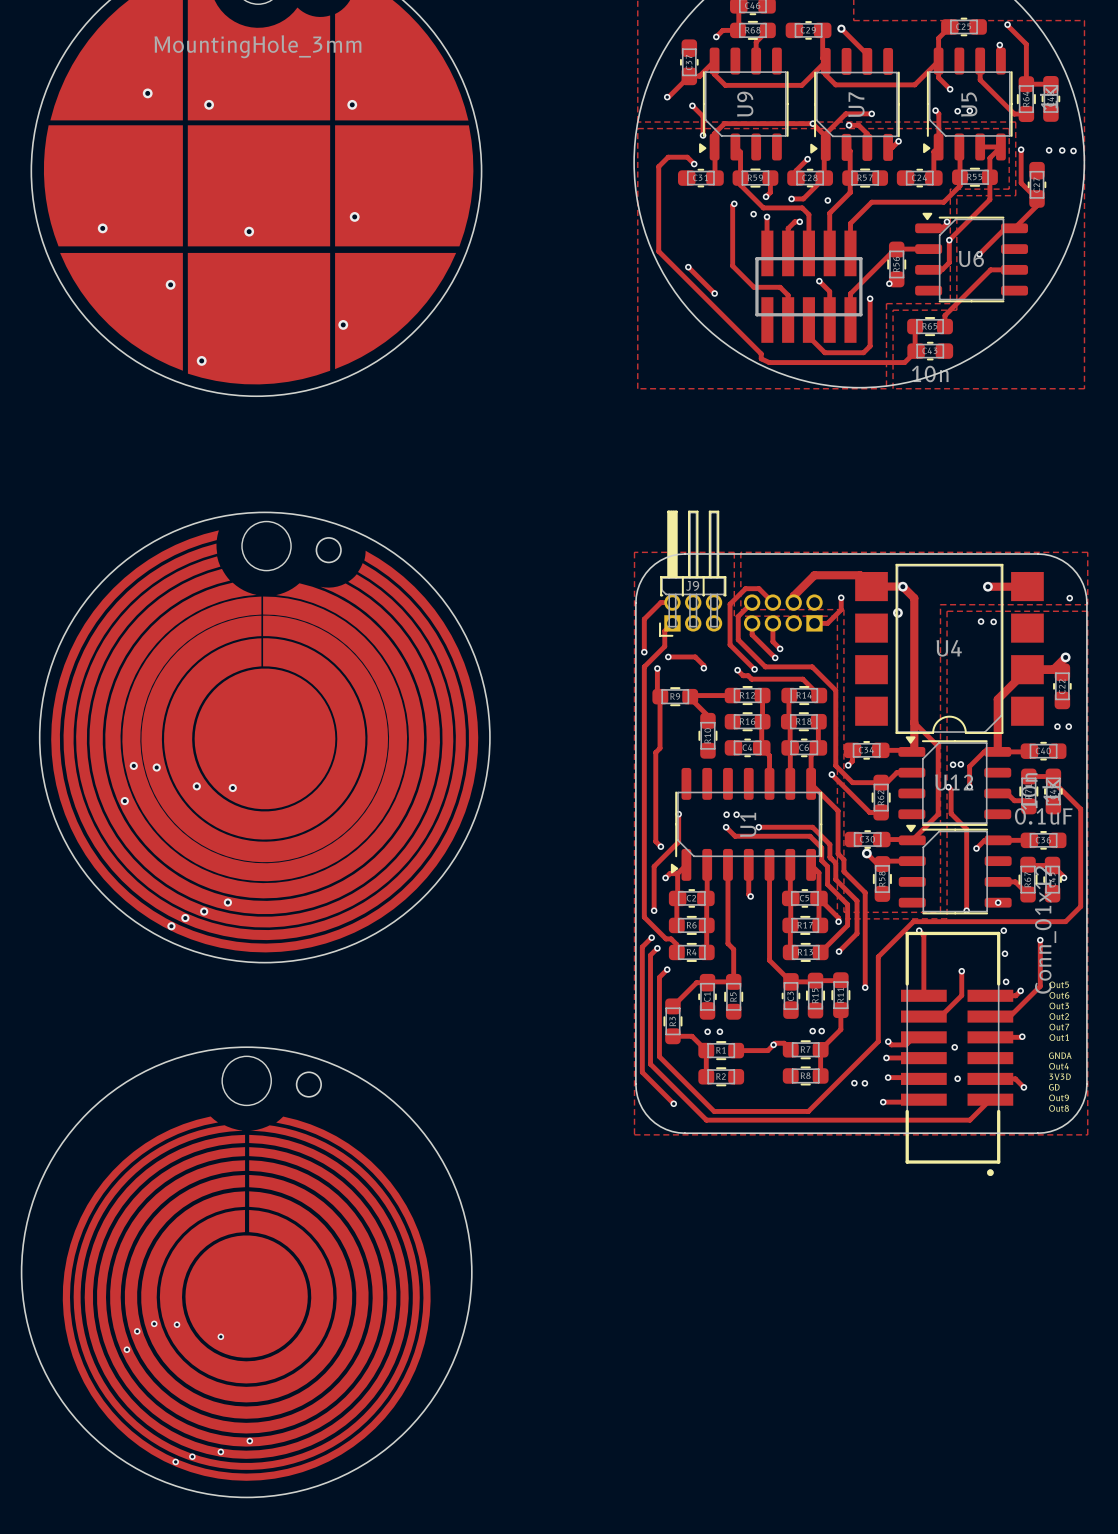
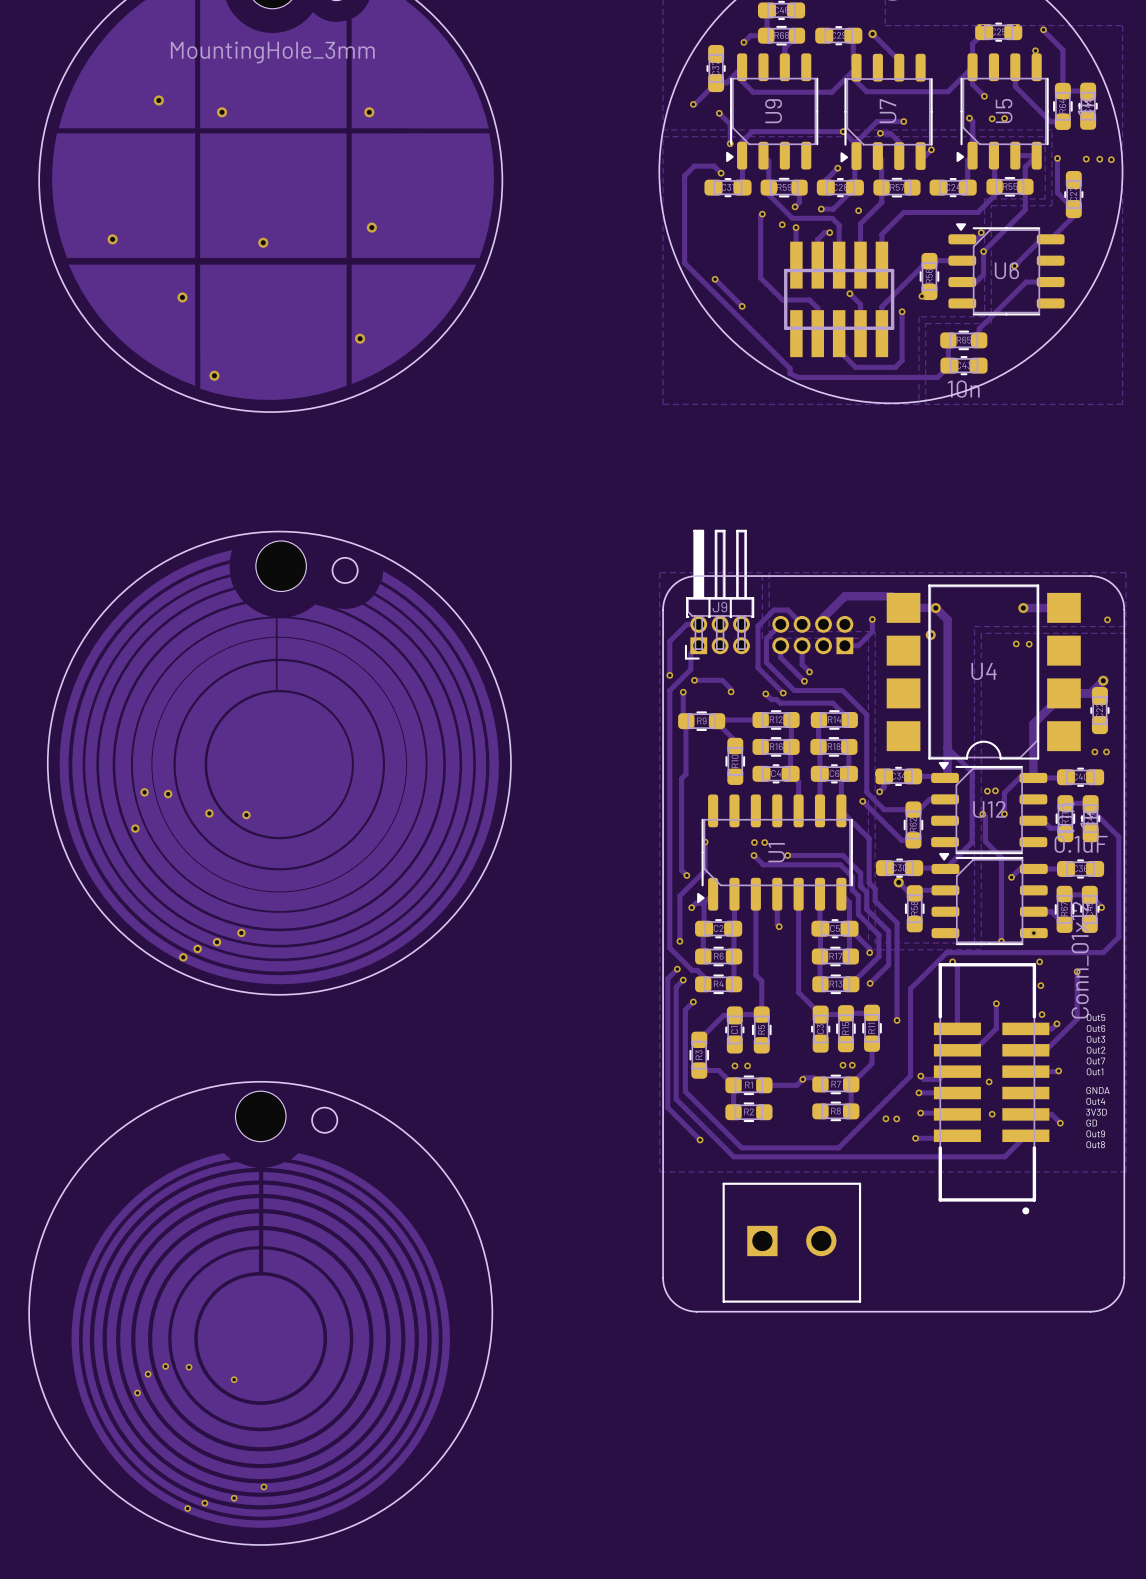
board edge: (684, 553) (1037, 553) (1050, 555) (1062, 560) (1072, 568) (1080, 578) (1085, 590) (1086, 603) (1086, 1084) (1085, 1096) (1080, 1108) (1072, 1118) (1062, 1126) (1050, 1131) (1037, 1133) (684, 1133) (672, 1131) (660, 1126) (650, 1118) (642, 1108) (637, 1096) (635, 1084) (636, 596) (639, 584) (650, 568) (666, 557) (684, 553) -> (696, 576) (682, 579) (672, 585) (666, 595) (663, 609) (663, 1278) (668, 1295) (678, 1306) (696, 1311) (1090, 1311) (1108, 1306) (1120, 1292) (1124, 1278) (1124, 609) (1119, 591) (1108, 581) (1090, 576) (696, 576)
part: none -> (791, 1242)

